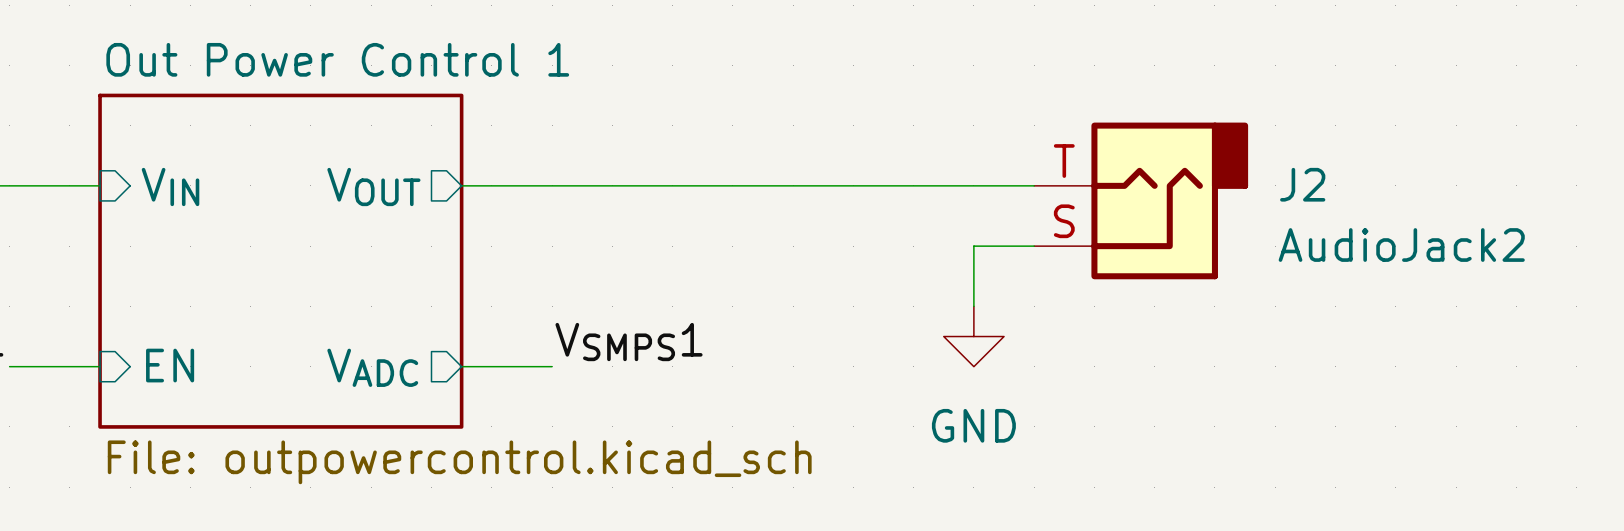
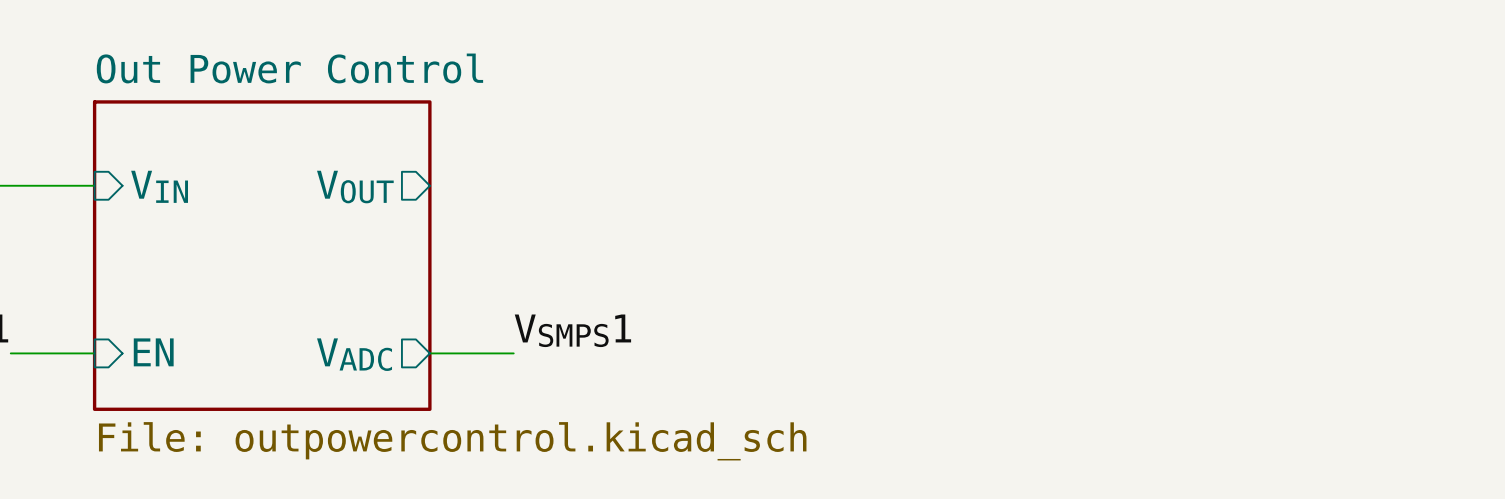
sheet Out Power Control 1 name: Out Power Control 1 (337, 59) -> Out Power Control (289, 68)
wire: (461, 185) (1034, 185) -> none
J2: AudioJack2 (1141, 200) -> none
wire: (1034, 246) (973, 246) (973, 306) -> none
power symbol: GND (973, 336) -> none

